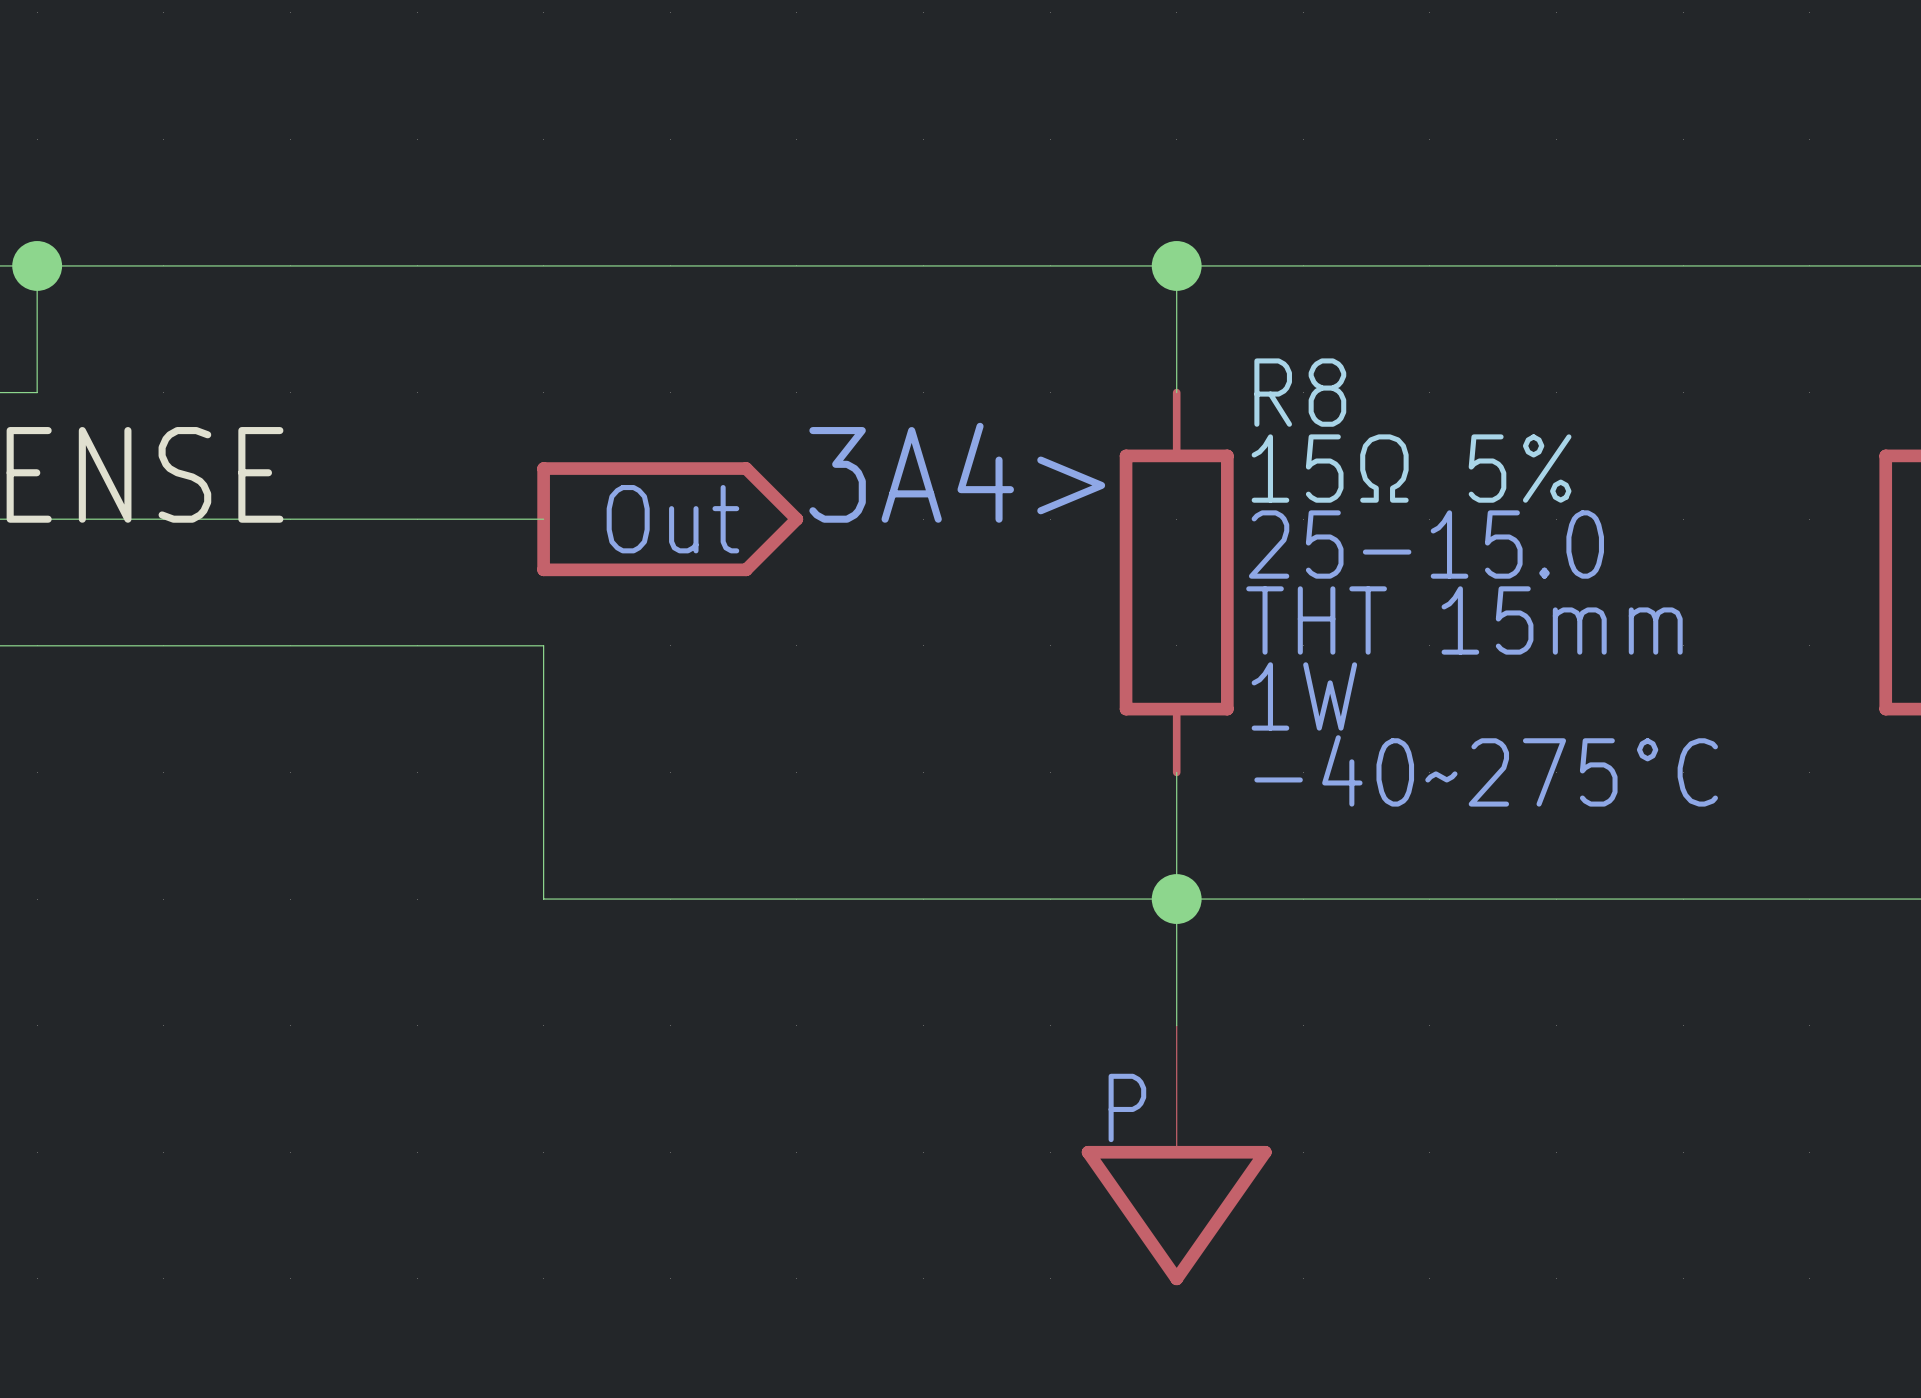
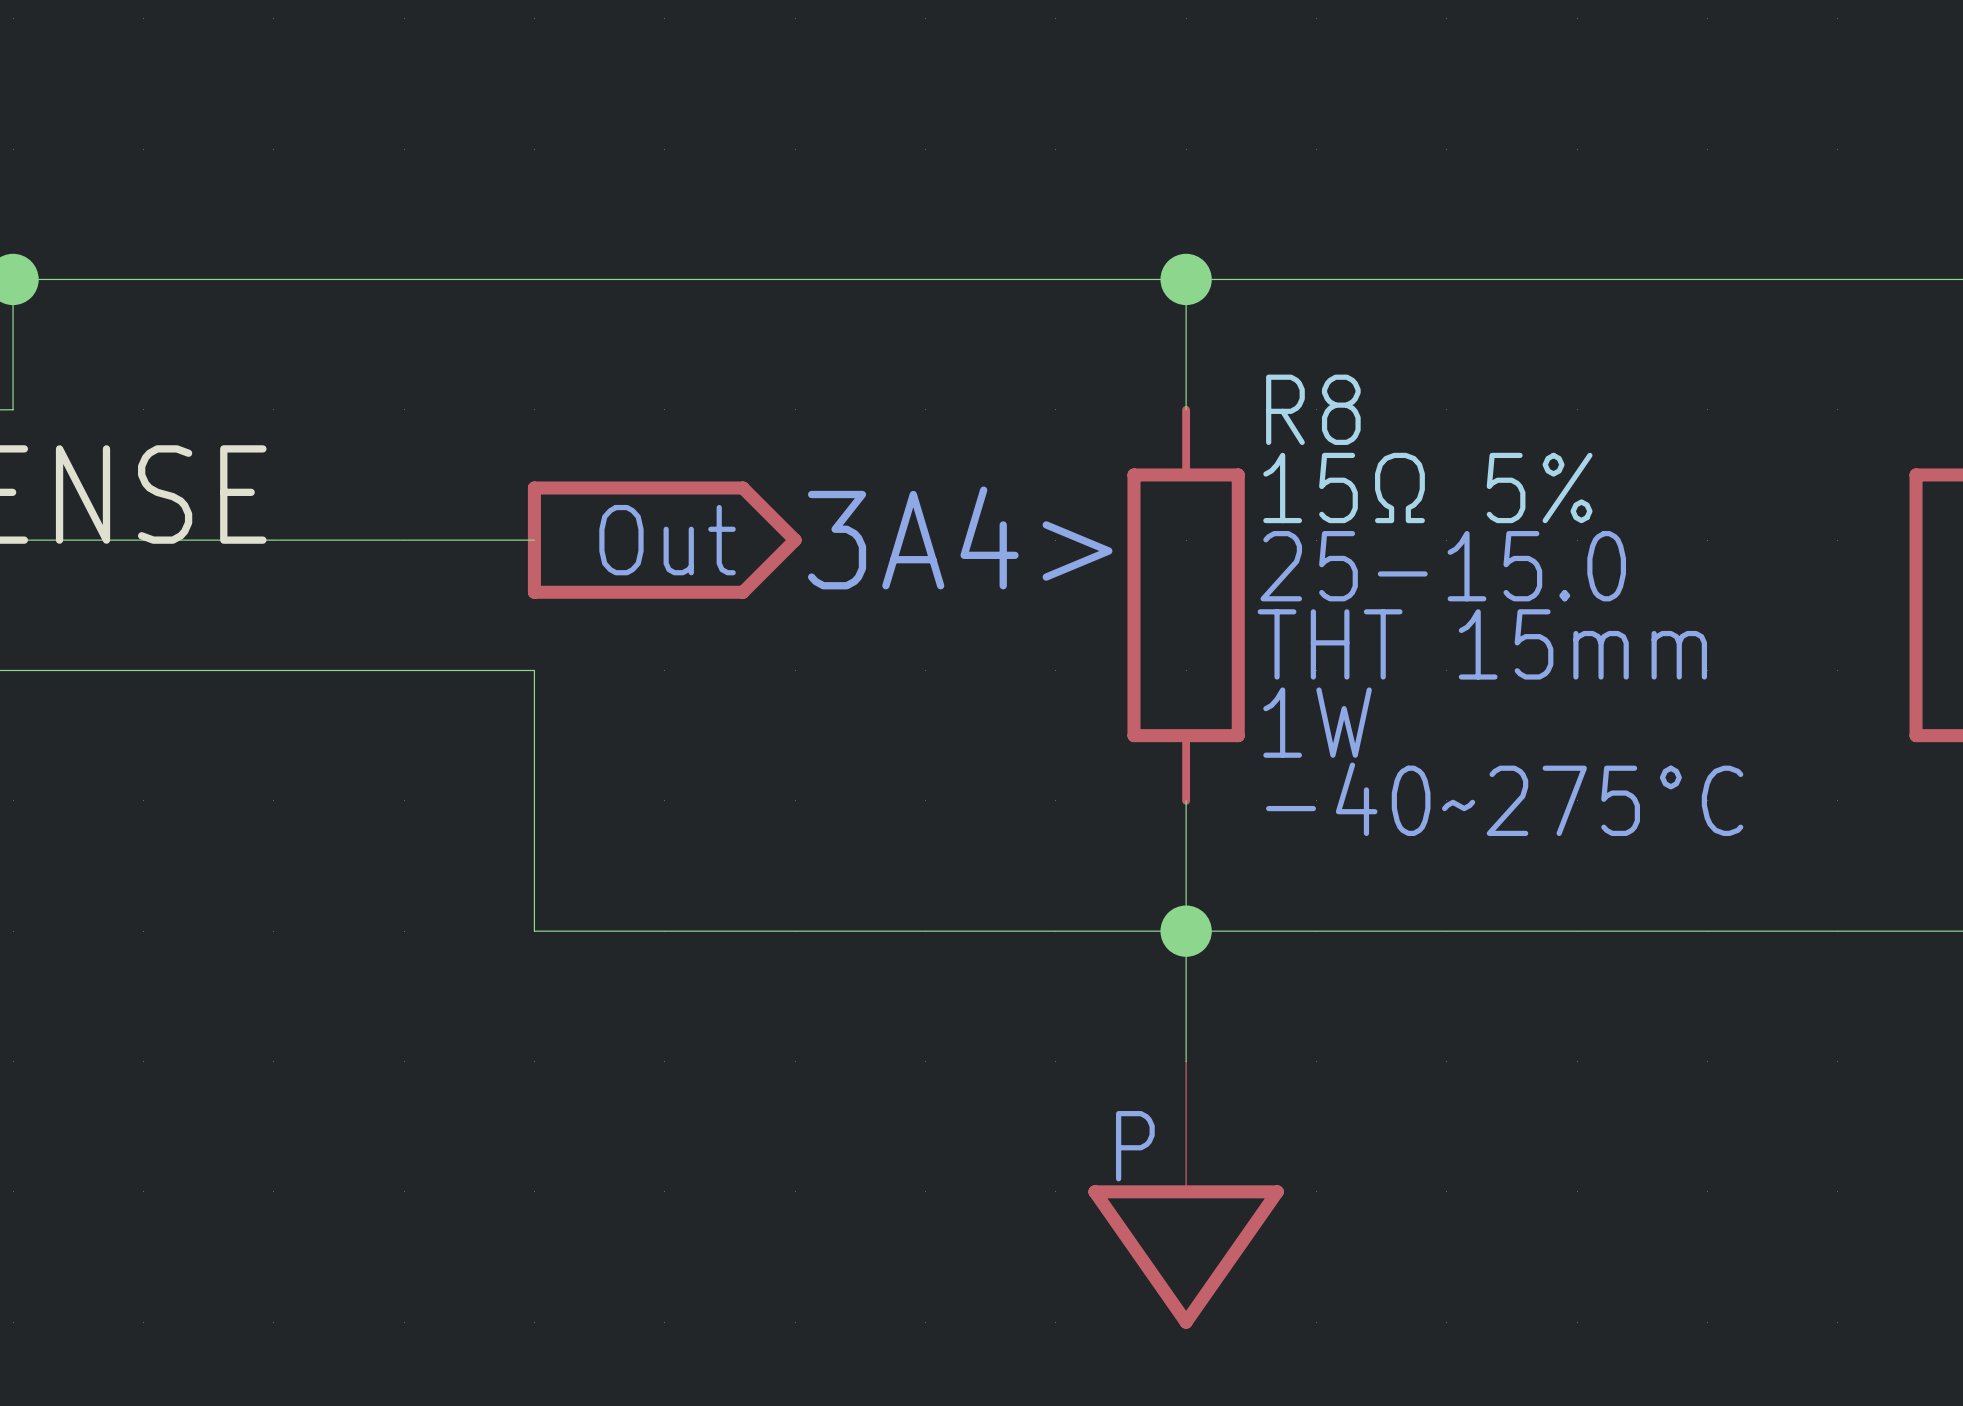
text position: 3A4> (957, 472) -> 3A4> (960, 537)

